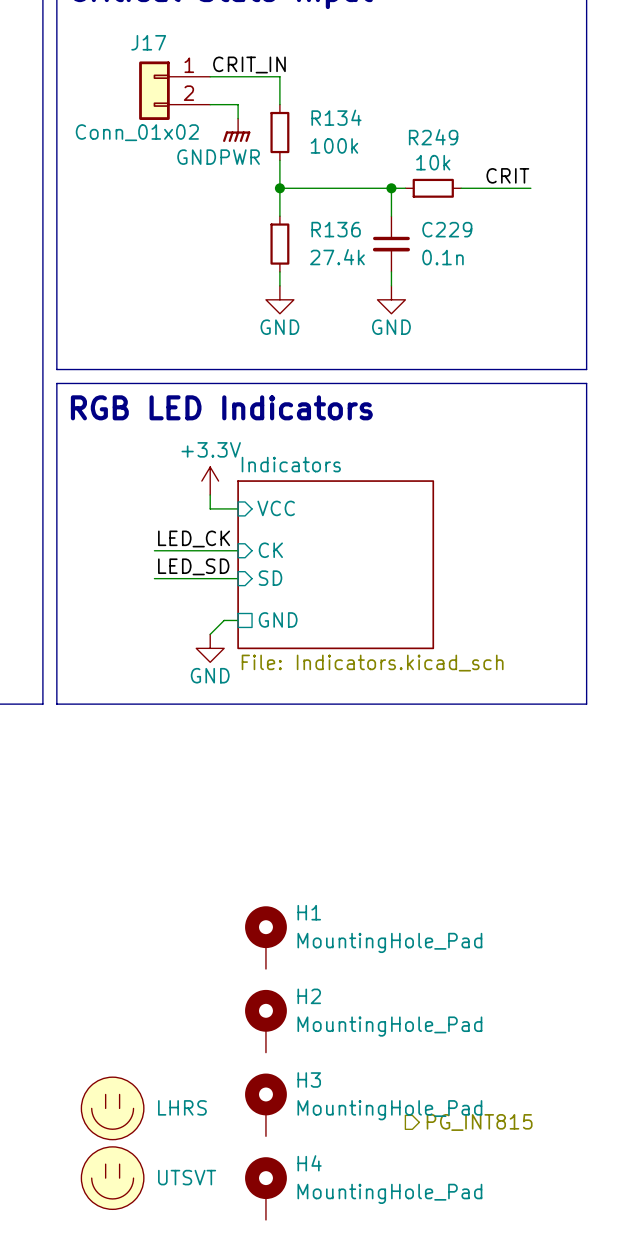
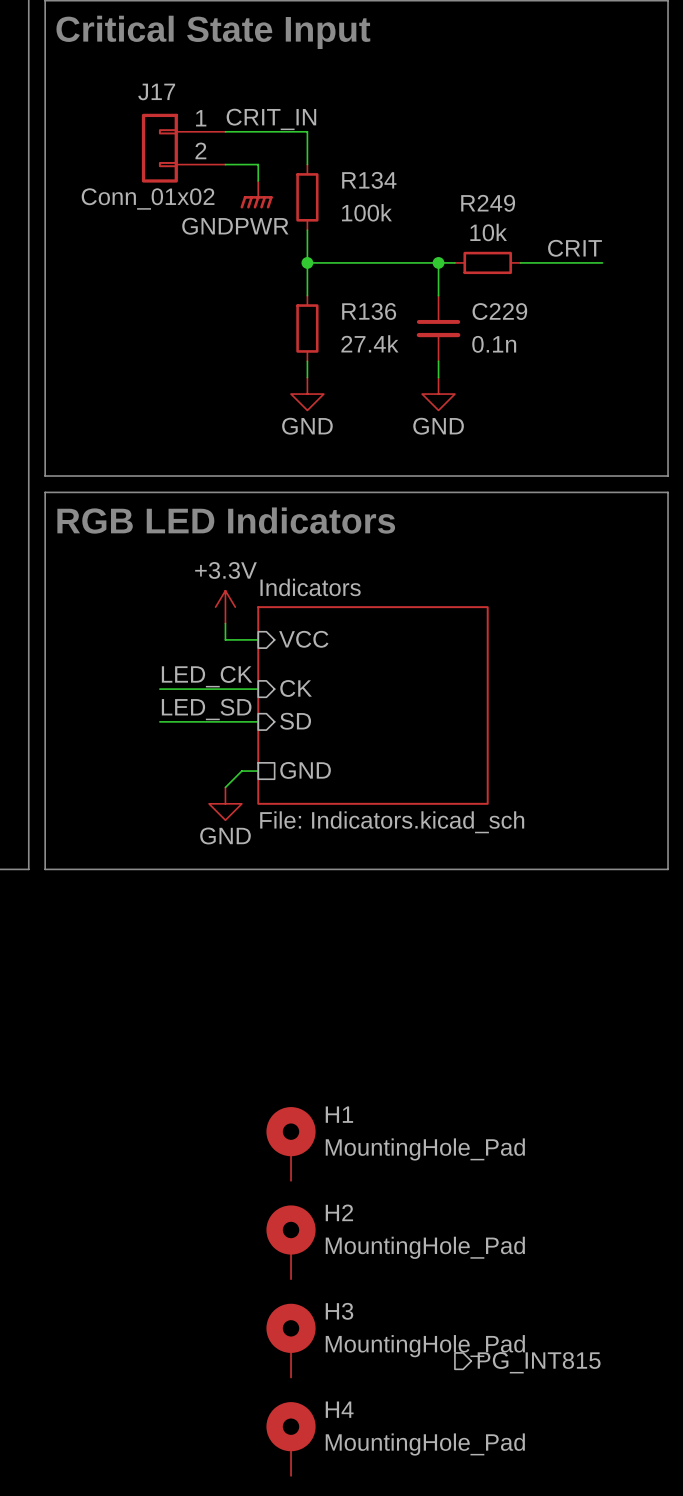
part: LHRS (112, 1108) -> none
part: UTSVT (112, 1178) -> none

